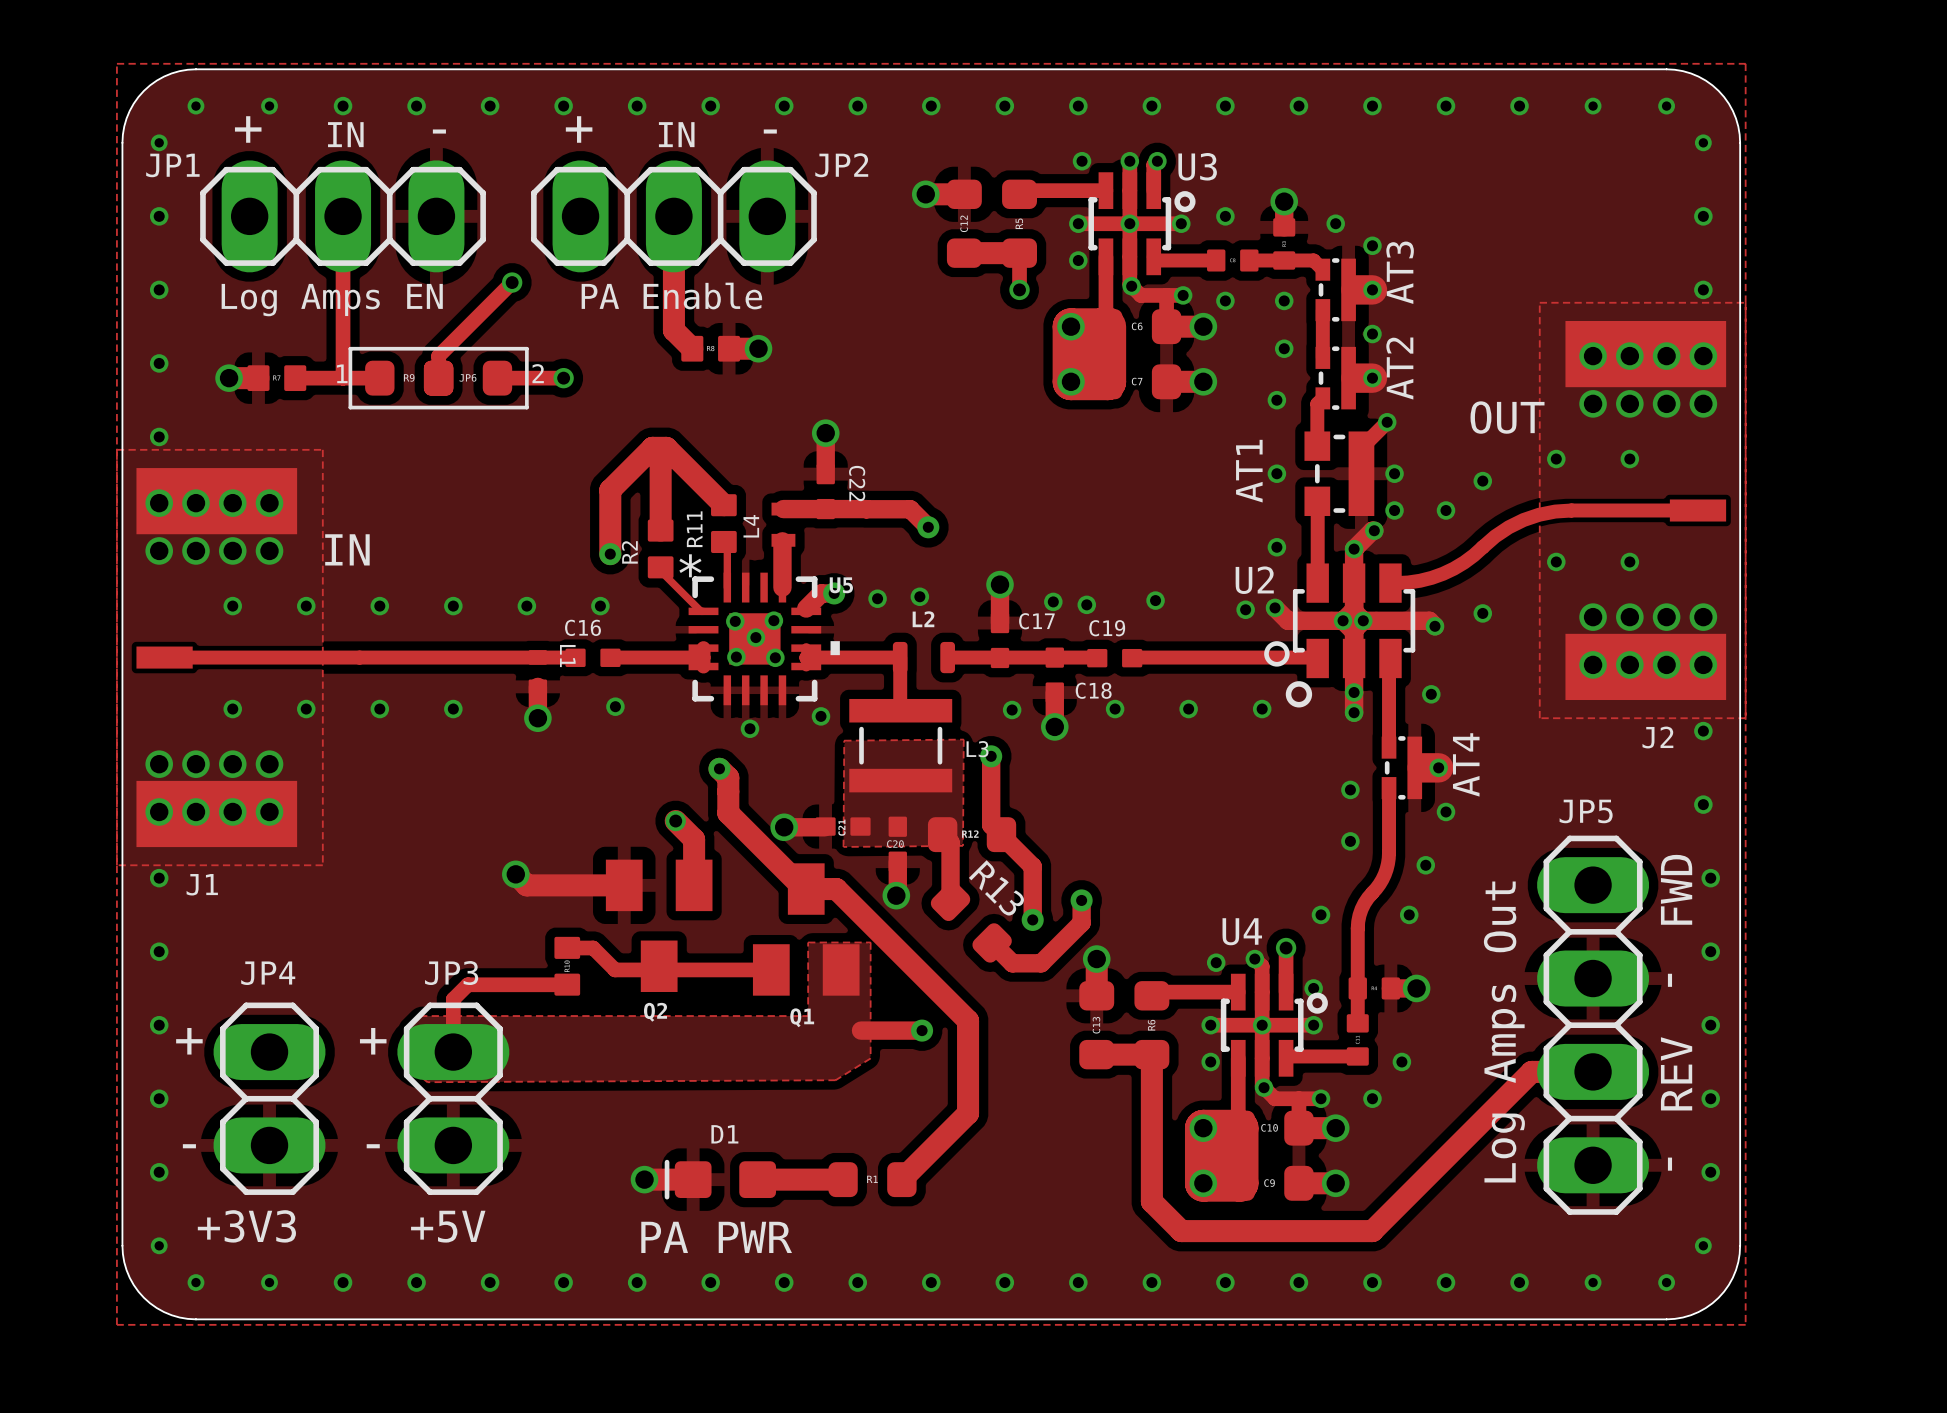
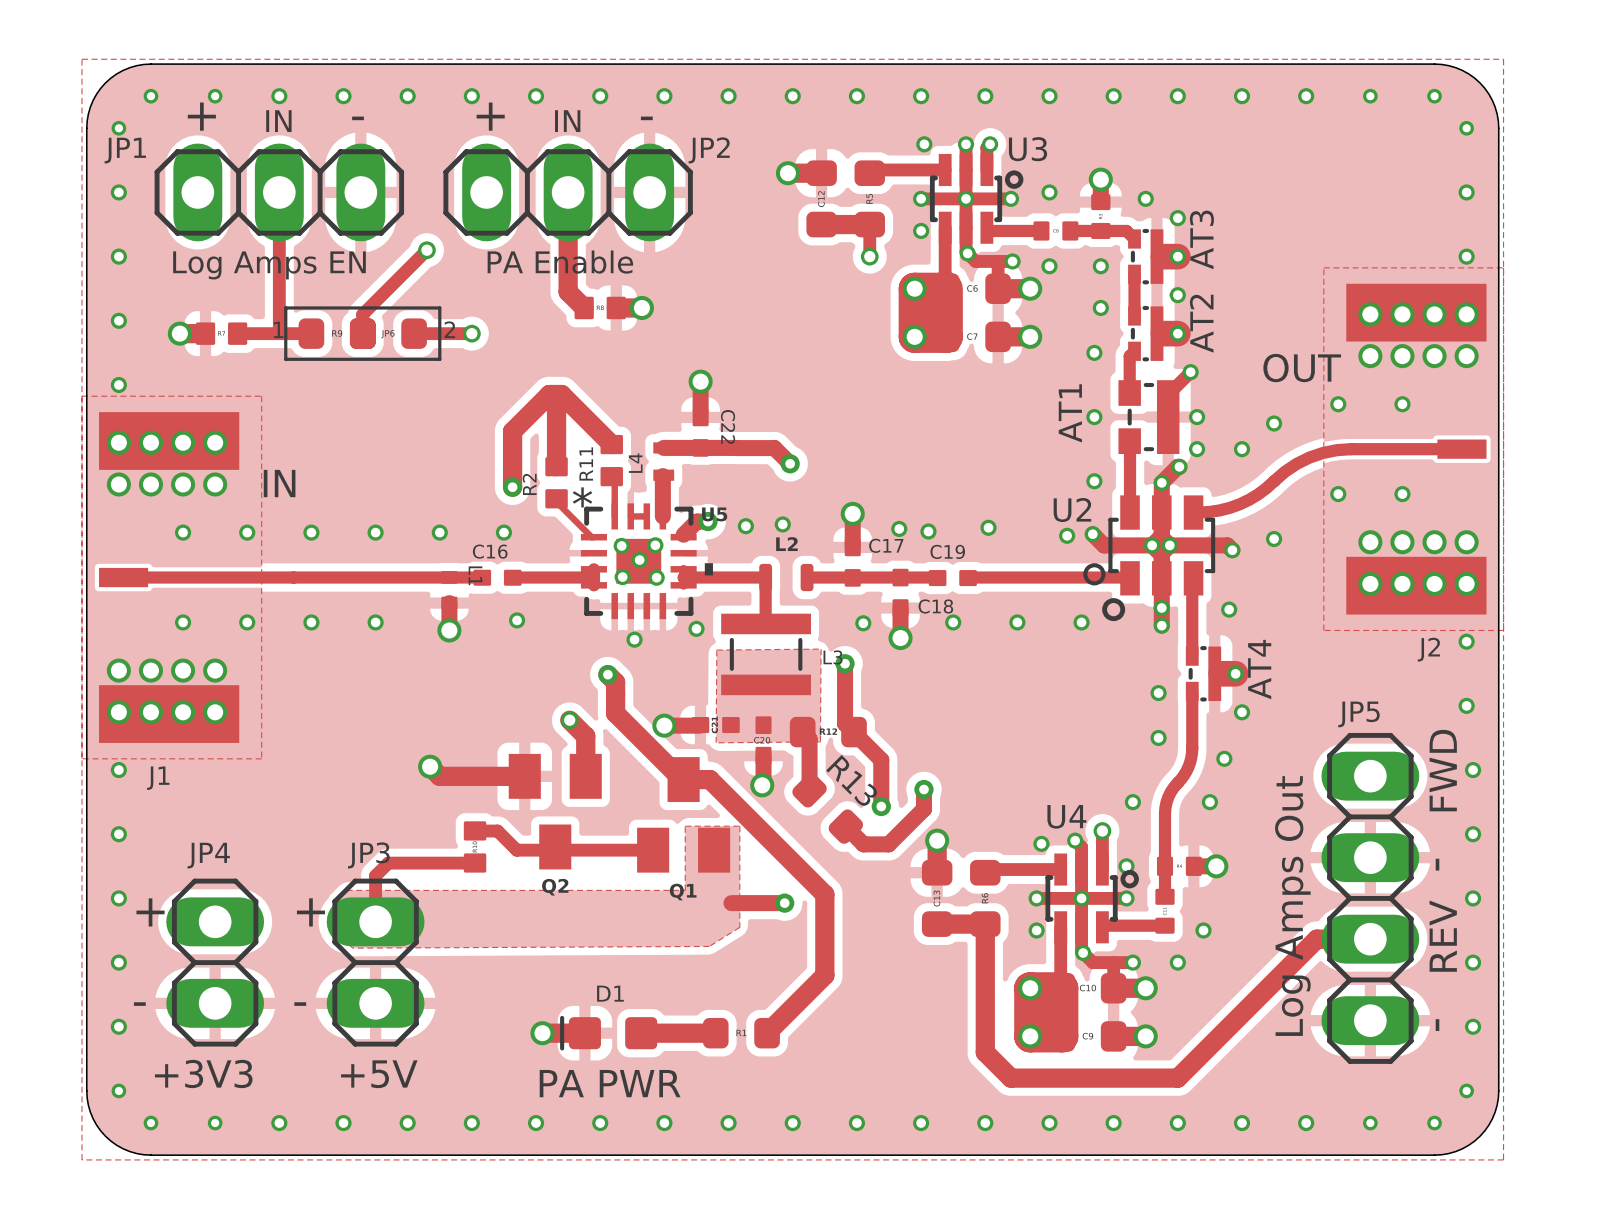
track: none -> (630, 516) (646, 516)

